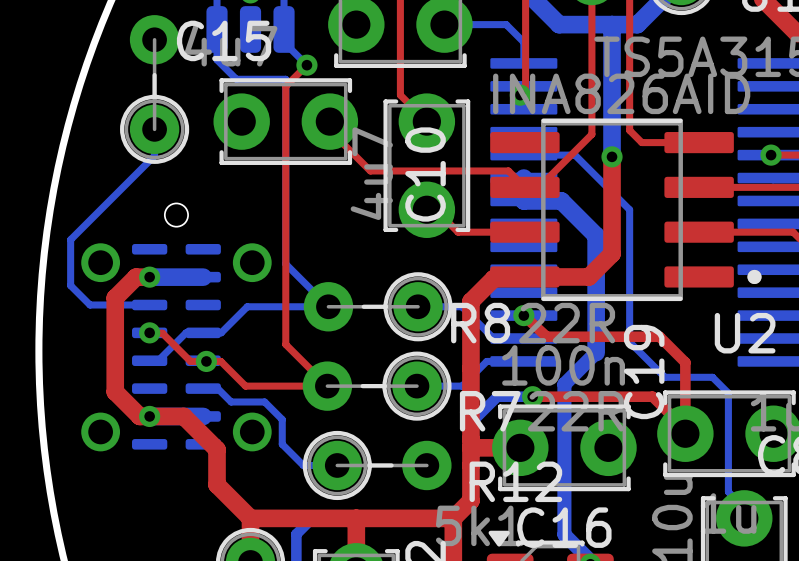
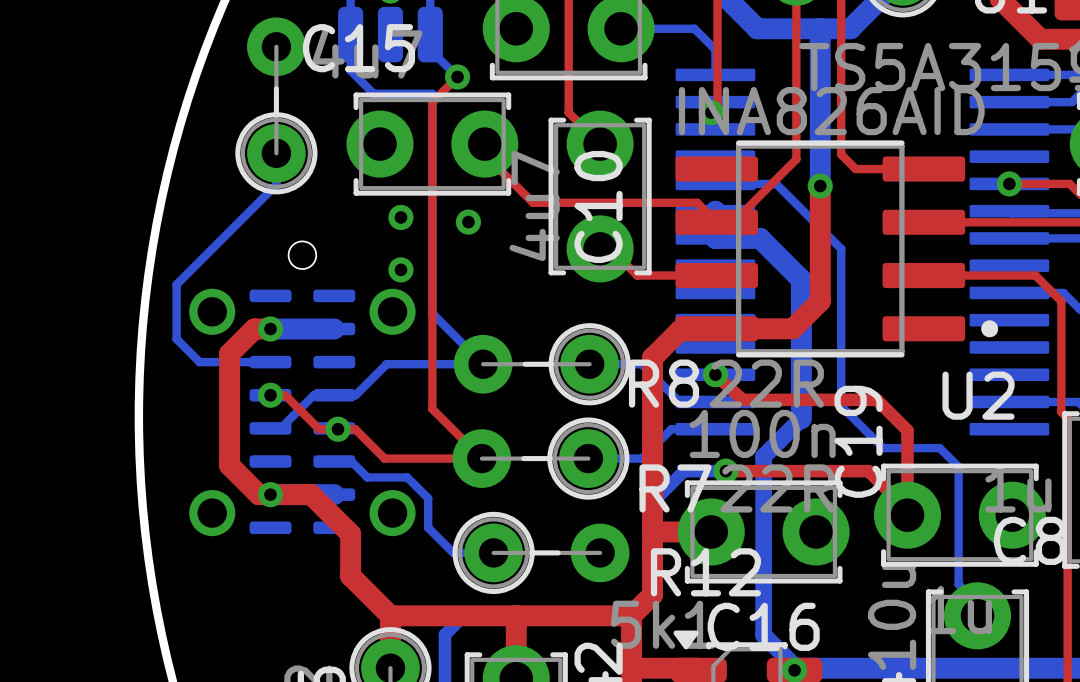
via: none -> (400, 217)
via: none -> (468, 222)
via: none -> (400, 269)

